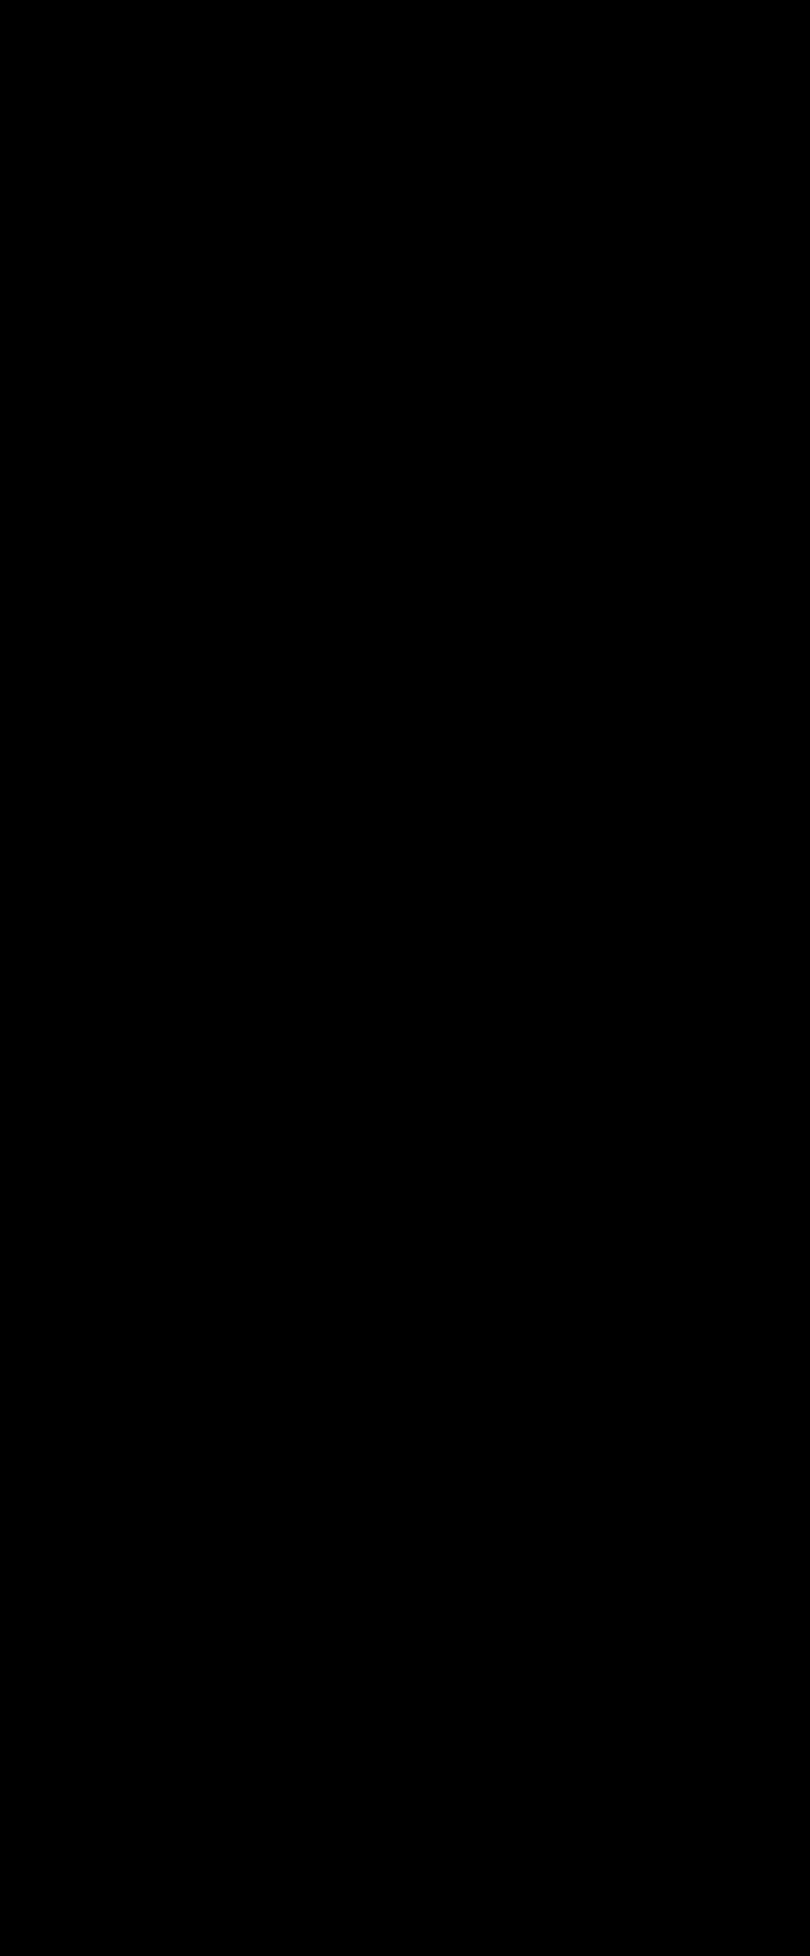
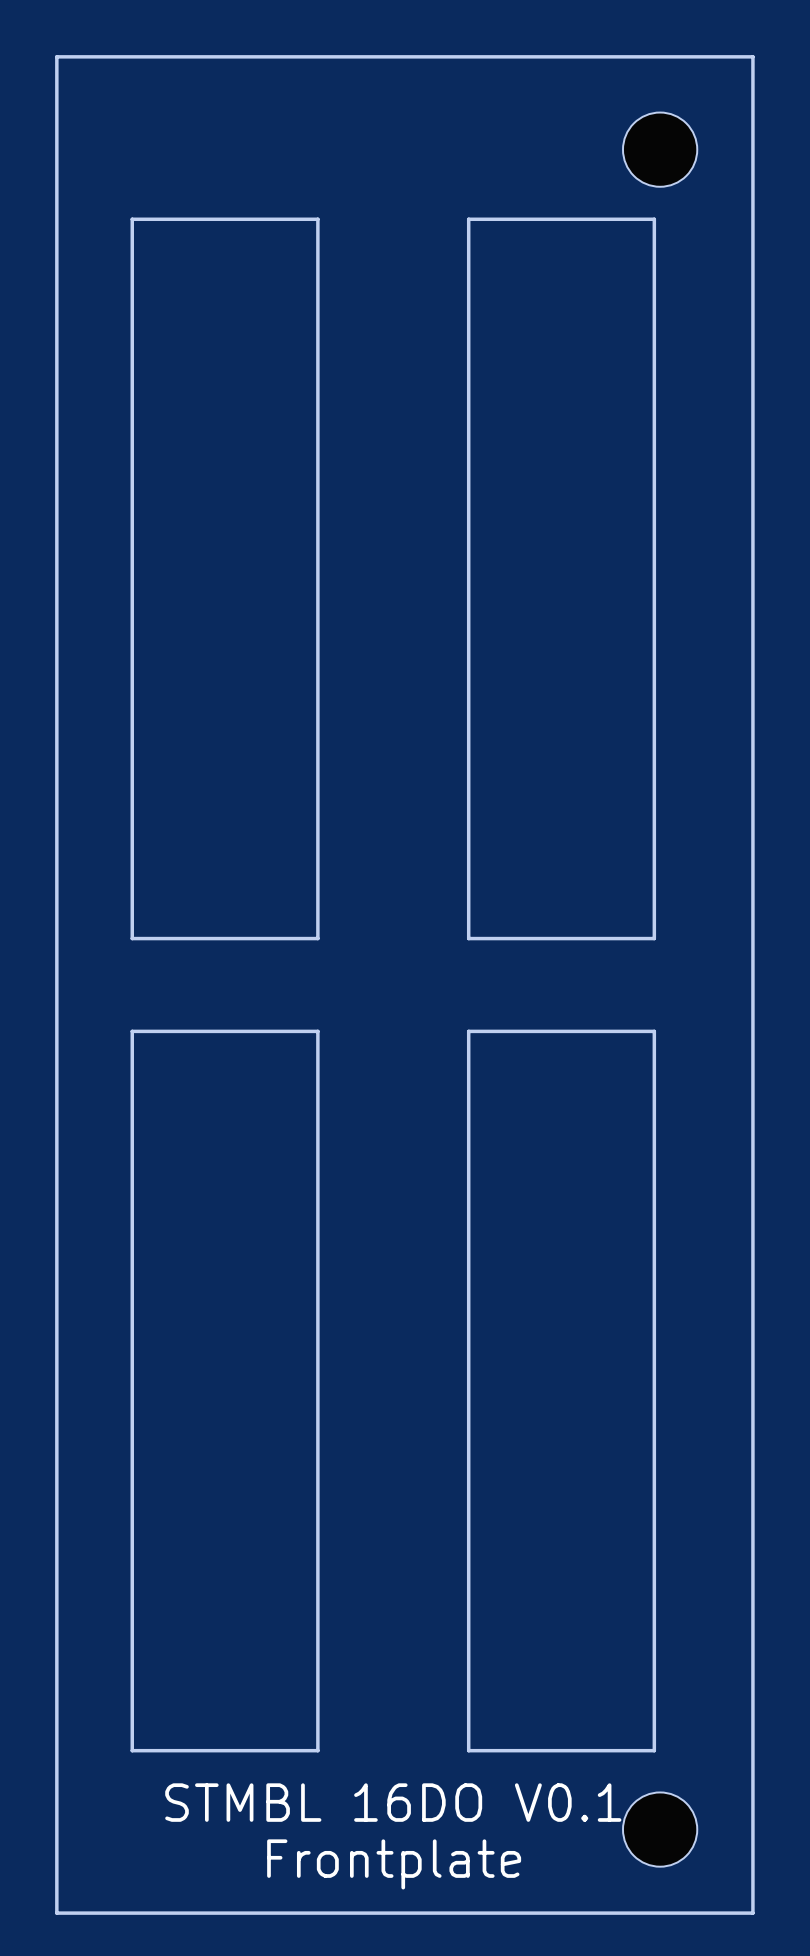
board edge: none -> (752, 56) (752, 1913) (56, 1913) (56, 56) (752, 56)
part: none -> (660, 149)
board edge: none -> (317, 219) (132, 219) (132, 938) (317, 938) (317, 219)
board edge: none -> (654, 219) (468, 219) (468, 938) (654, 938) (654, 219)
board edge: none -> (317, 1031) (132, 1031) (132, 1750) (317, 1750) (317, 1031)
board edge: none -> (654, 1031) (654, 1750) (468, 1750) (468, 1031) (654, 1031)
text: none -> STMBL 16DO V0.1 (393, 1802)
part: none -> (660, 1829)
text: none -> Frontplate (394, 1864)

